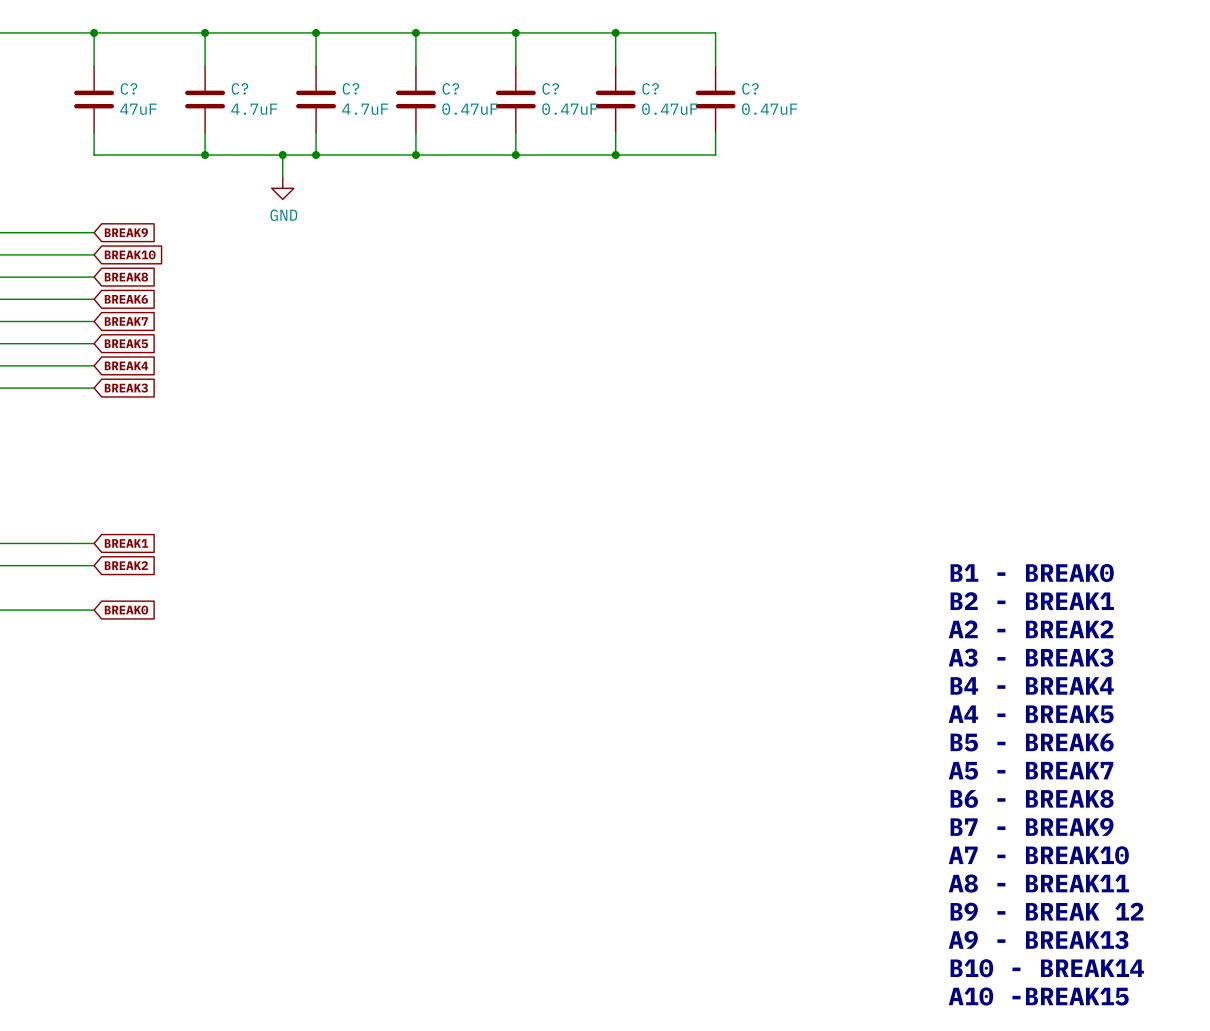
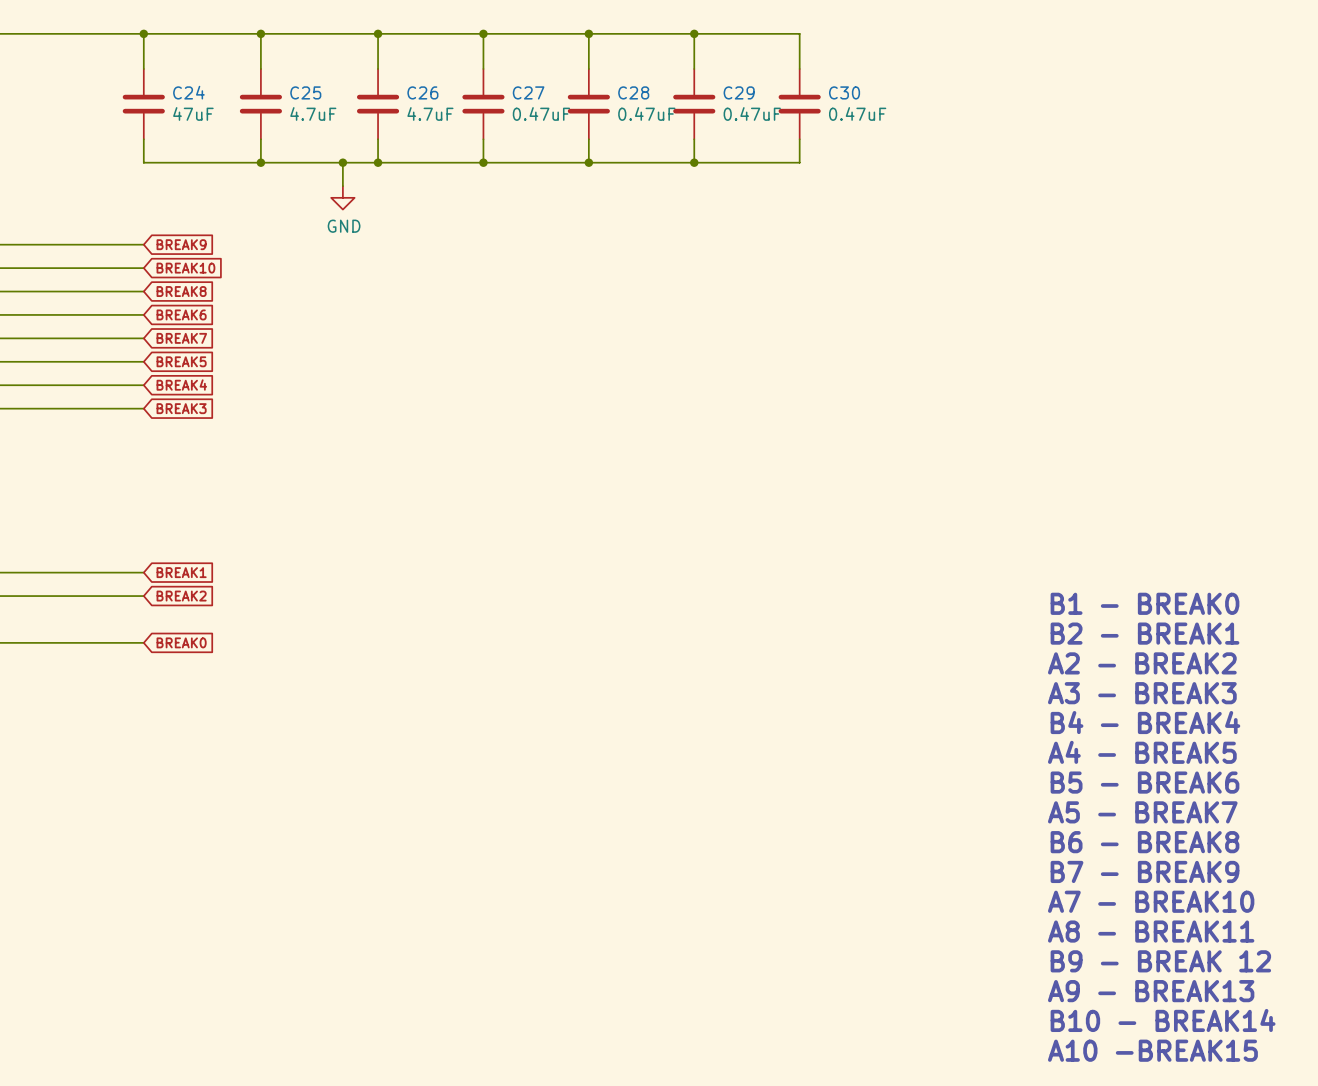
C? name: C? (129, 88) -> C24 (188, 92)
C? name: C? (239, 88) -> C25 (305, 92)
C? name: C? (350, 88) -> C26 (422, 92)
C? name: C? (450, 88) -> C27 (528, 92)
C? name: C? (550, 88) -> C28 (633, 92)
C? name: C? (650, 88) -> C29 (739, 92)
C? name: C? (750, 88) -> C30 (844, 92)

